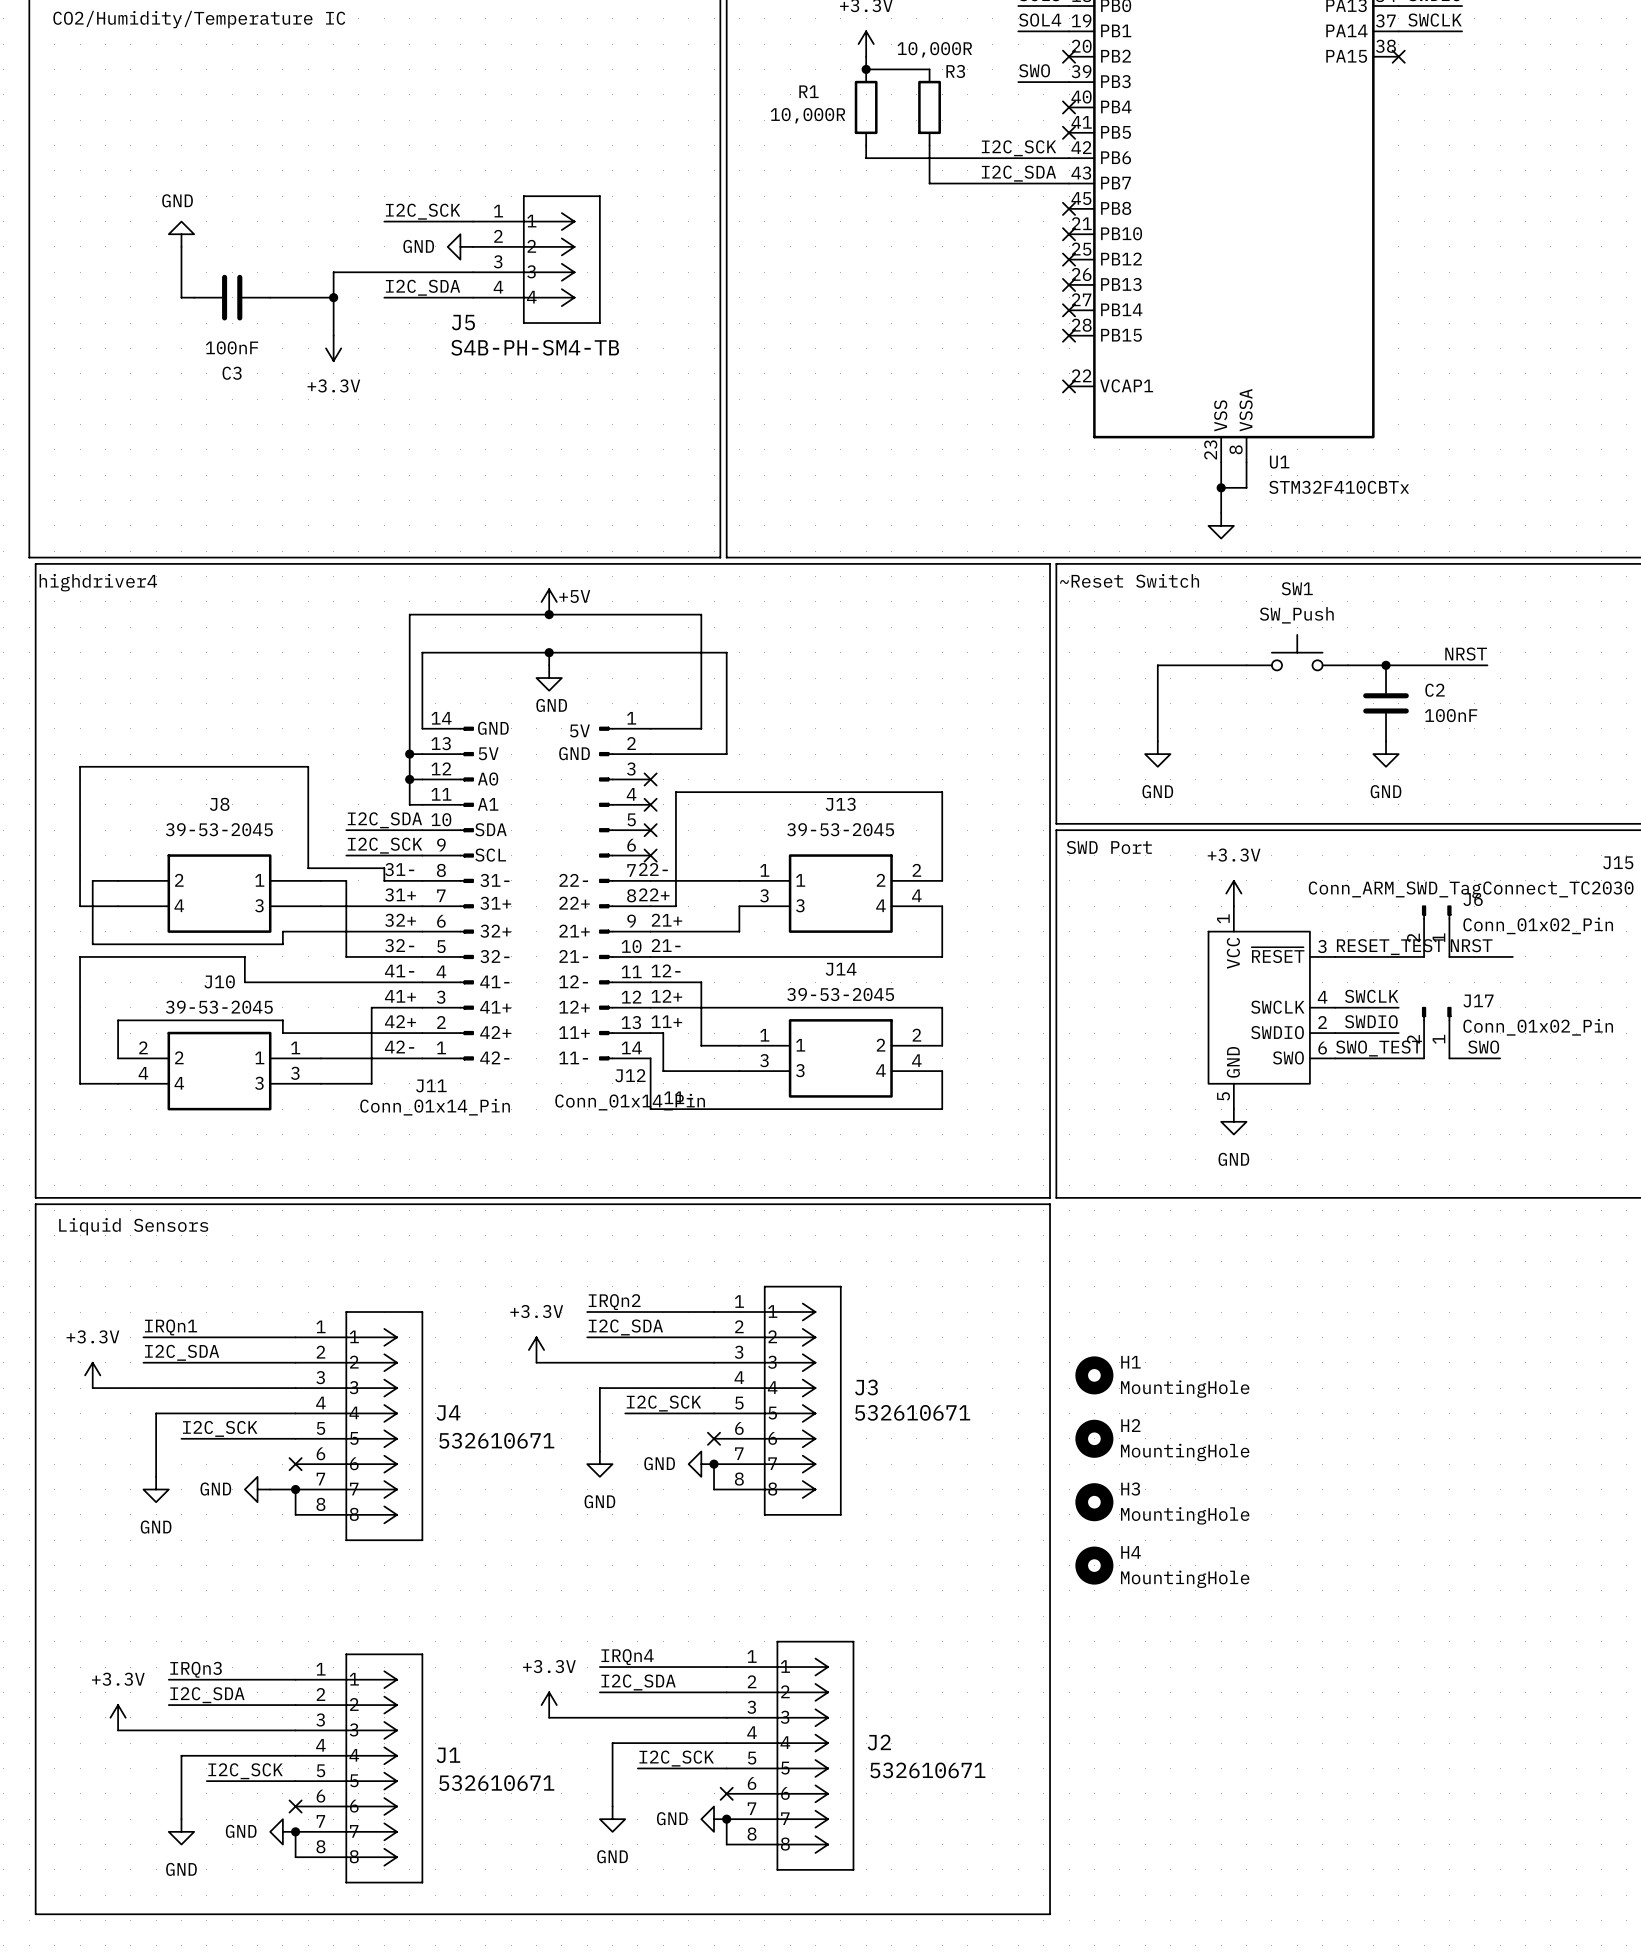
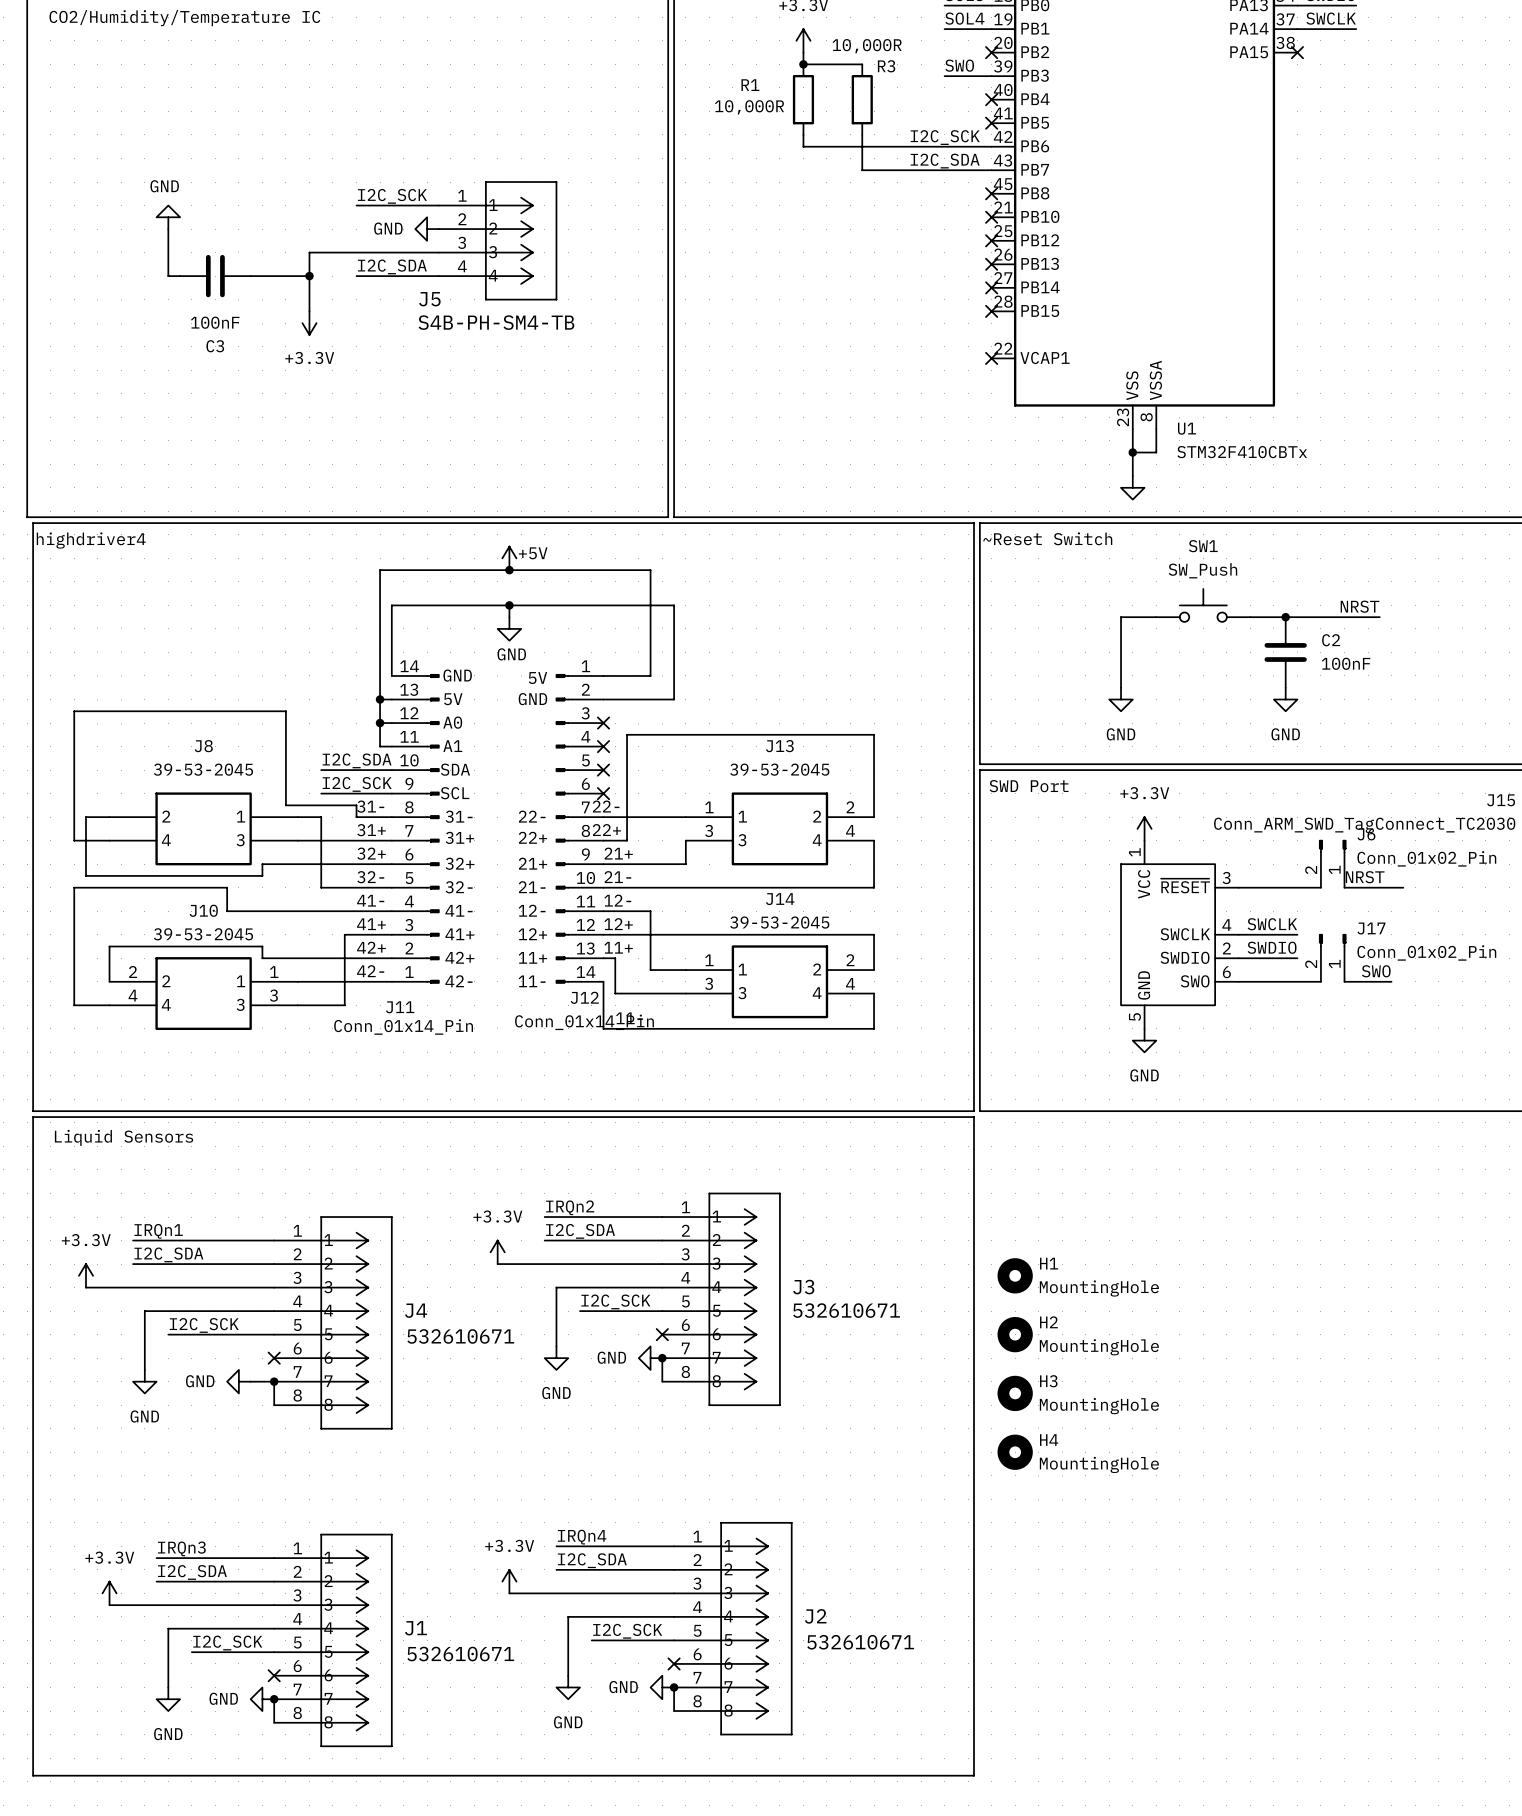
wire: (1208, 665) (1157, 665) (1157, 741) -> (1121, 617) (1121, 687)
power symbol position: GND (1157, 754) -> GND (1121, 699)
label: RESET_TEST (1390, 947) -> none
label: SWO_TEST (1379, 1048) -> none

